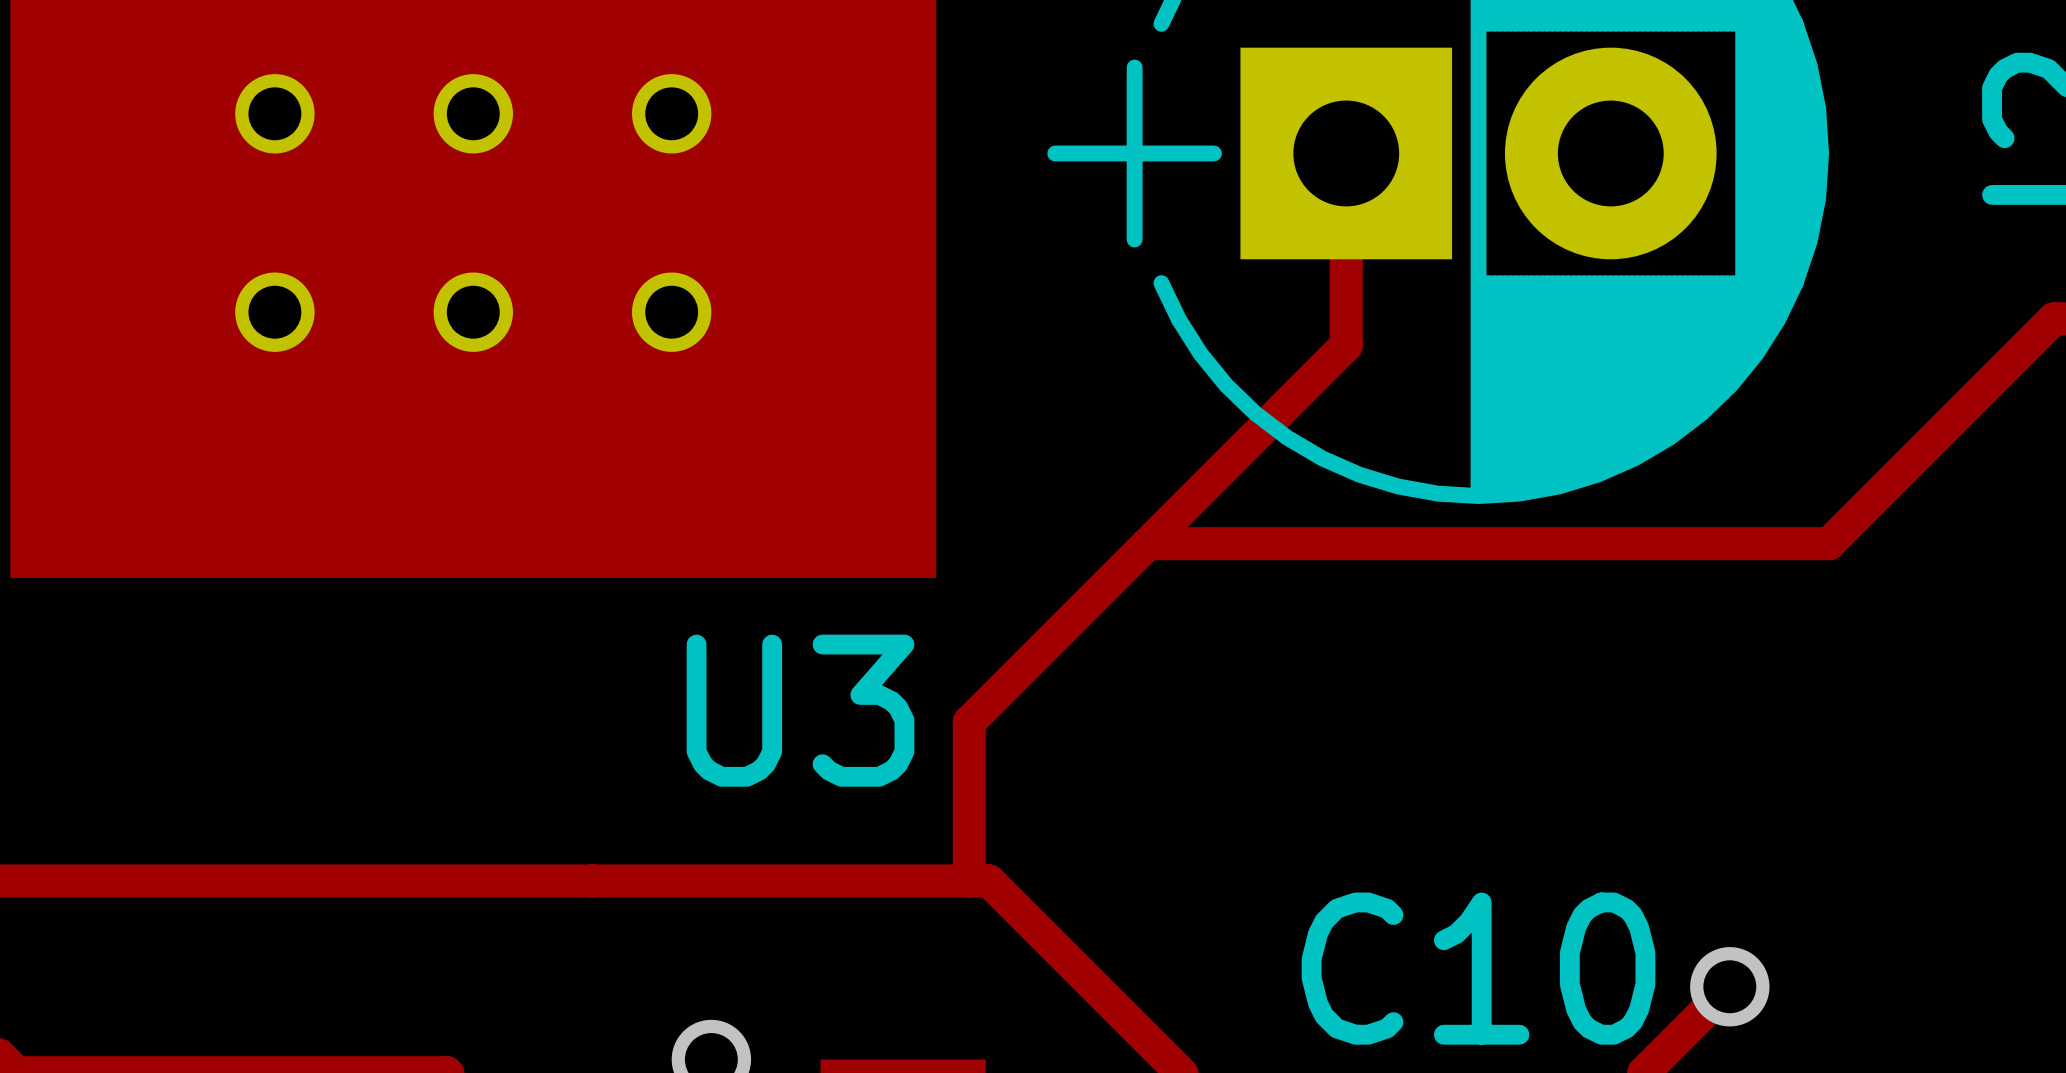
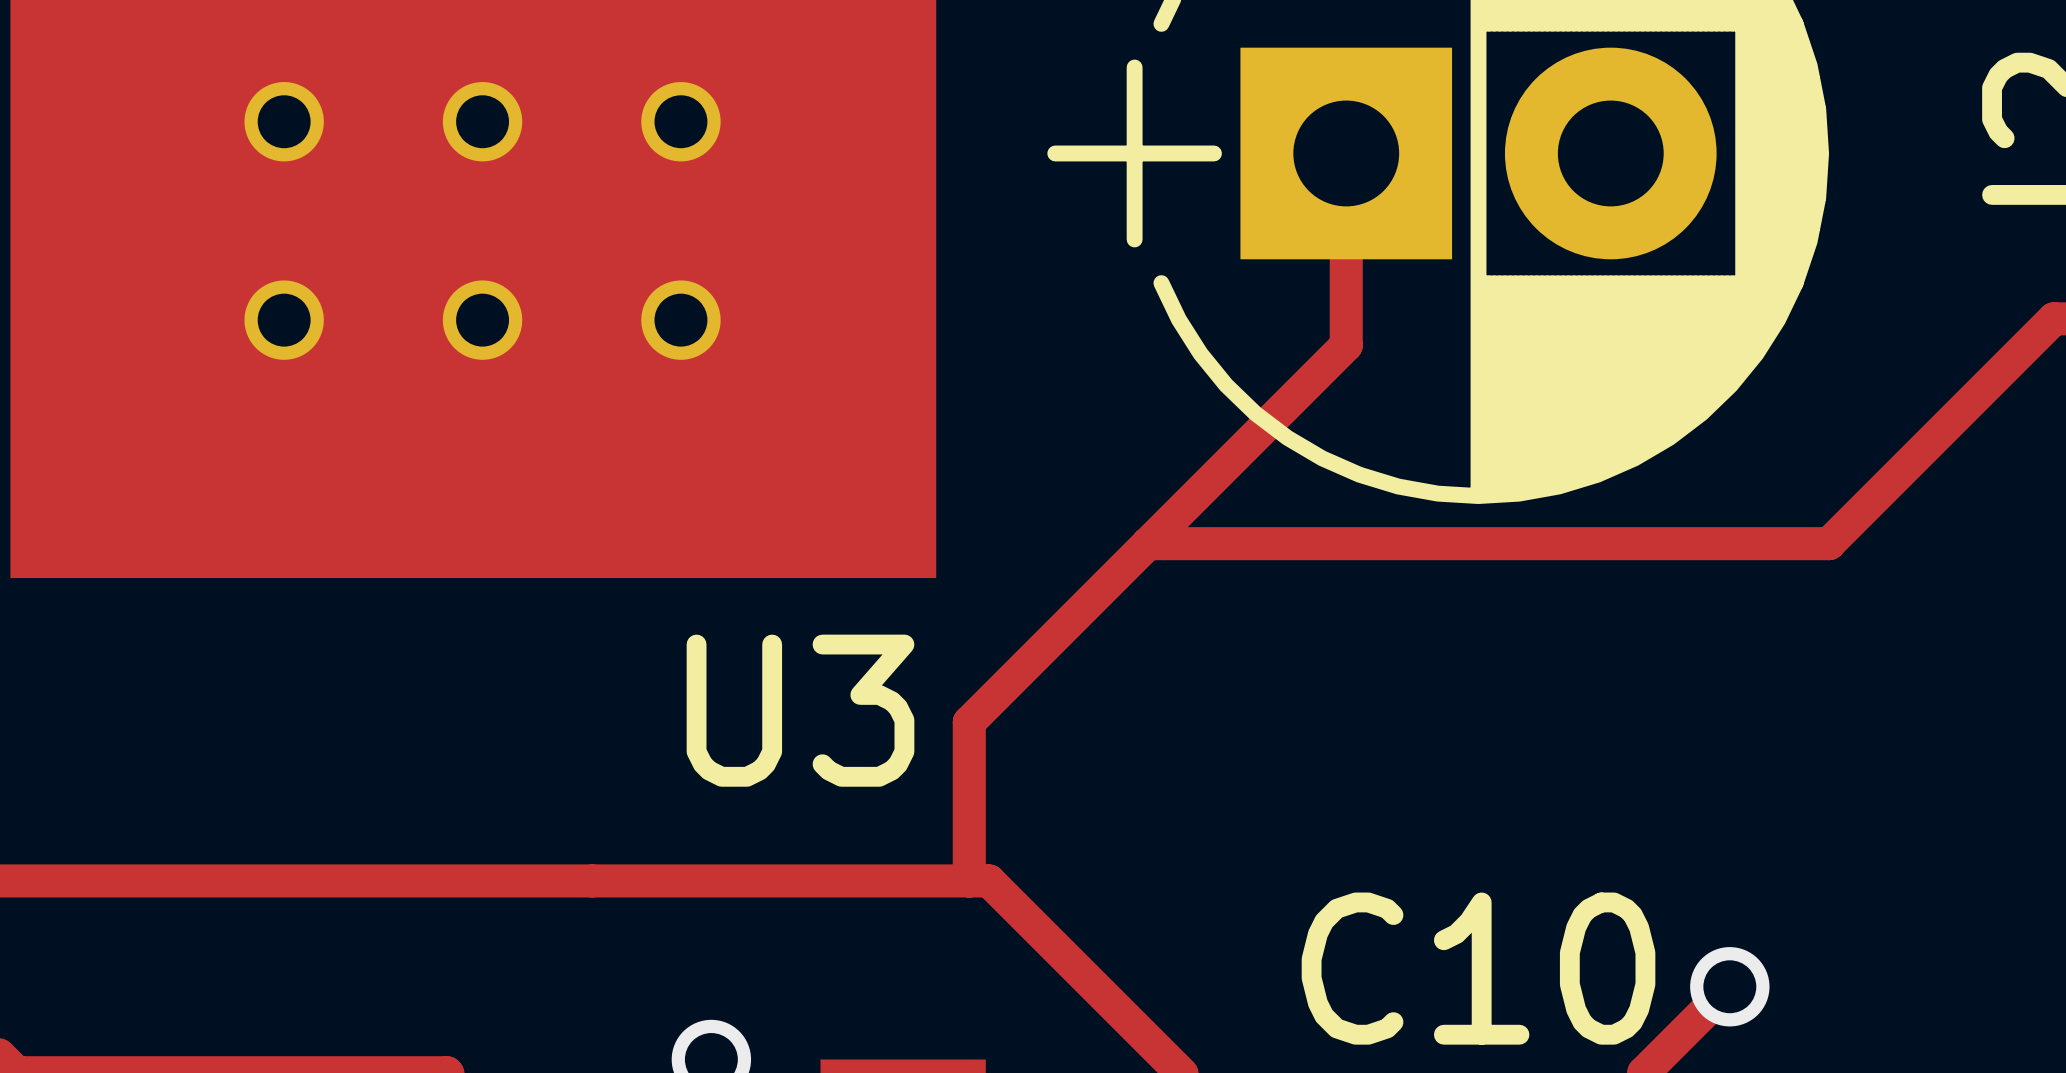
part position: (274, 113) -> (284, 121)
part position: (473, 113) -> (482, 121)
part position: (671, 113) -> (680, 121)
part position: (274, 312) -> (284, 320)
part position: (473, 312) -> (482, 320)
part position: (671, 312) -> (680, 320)

